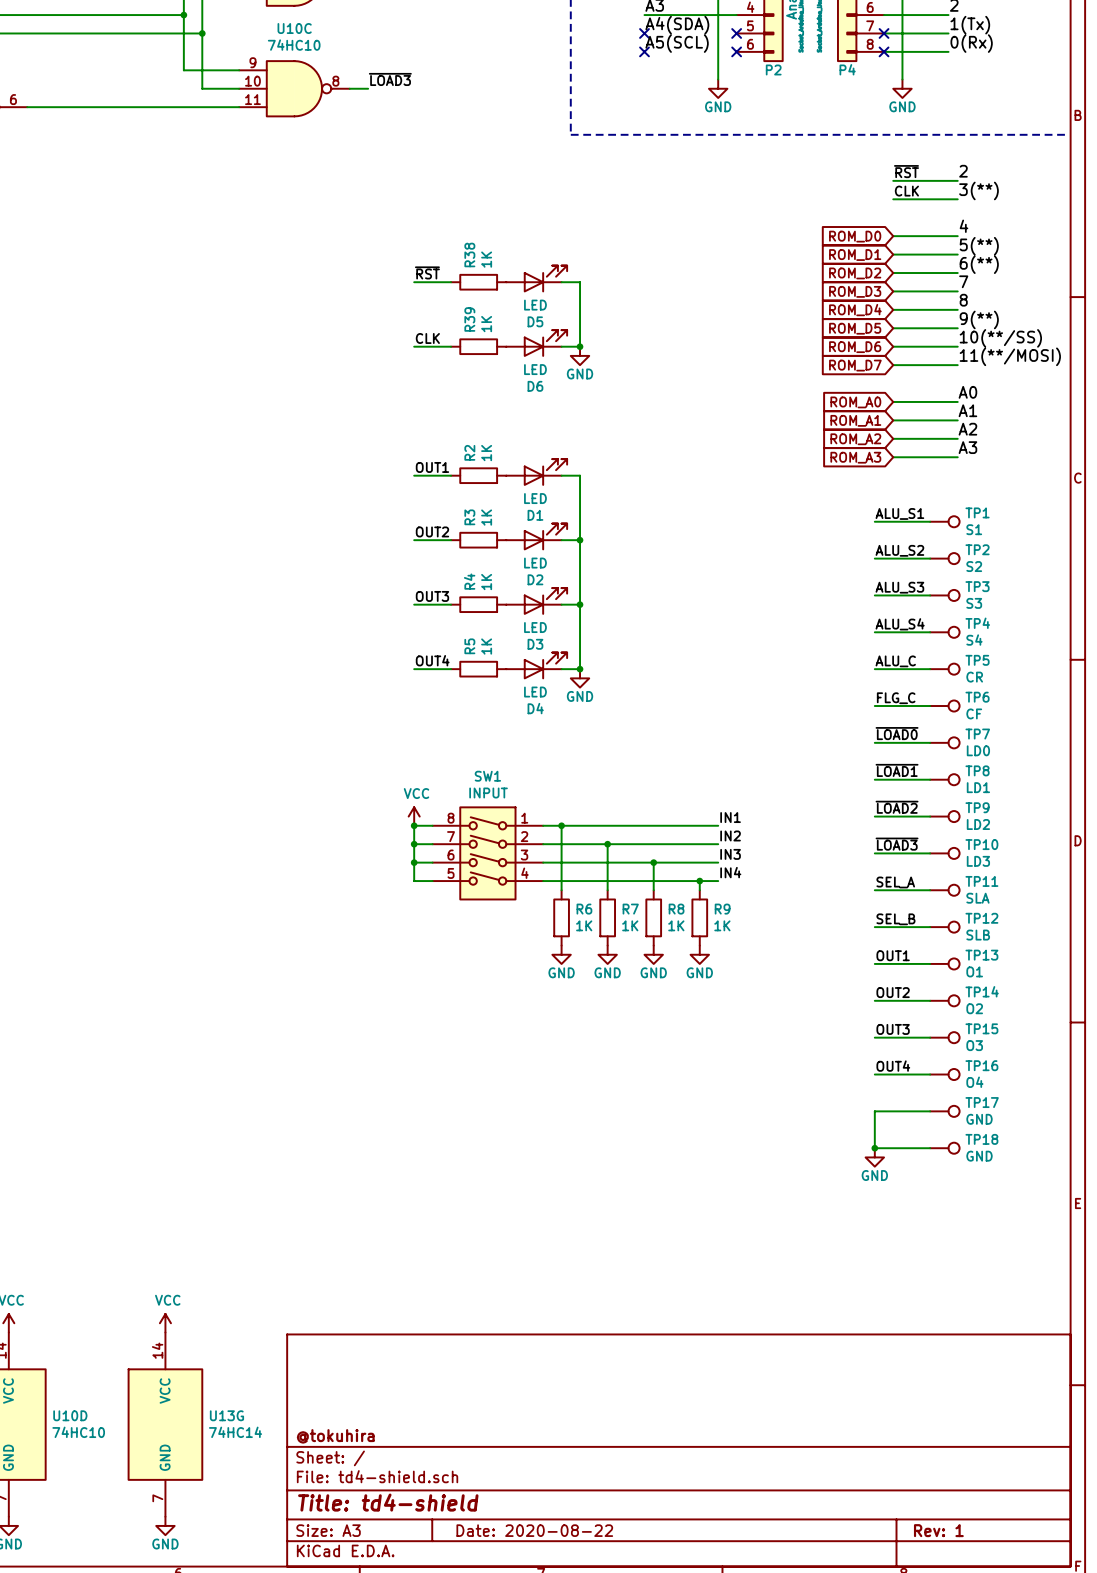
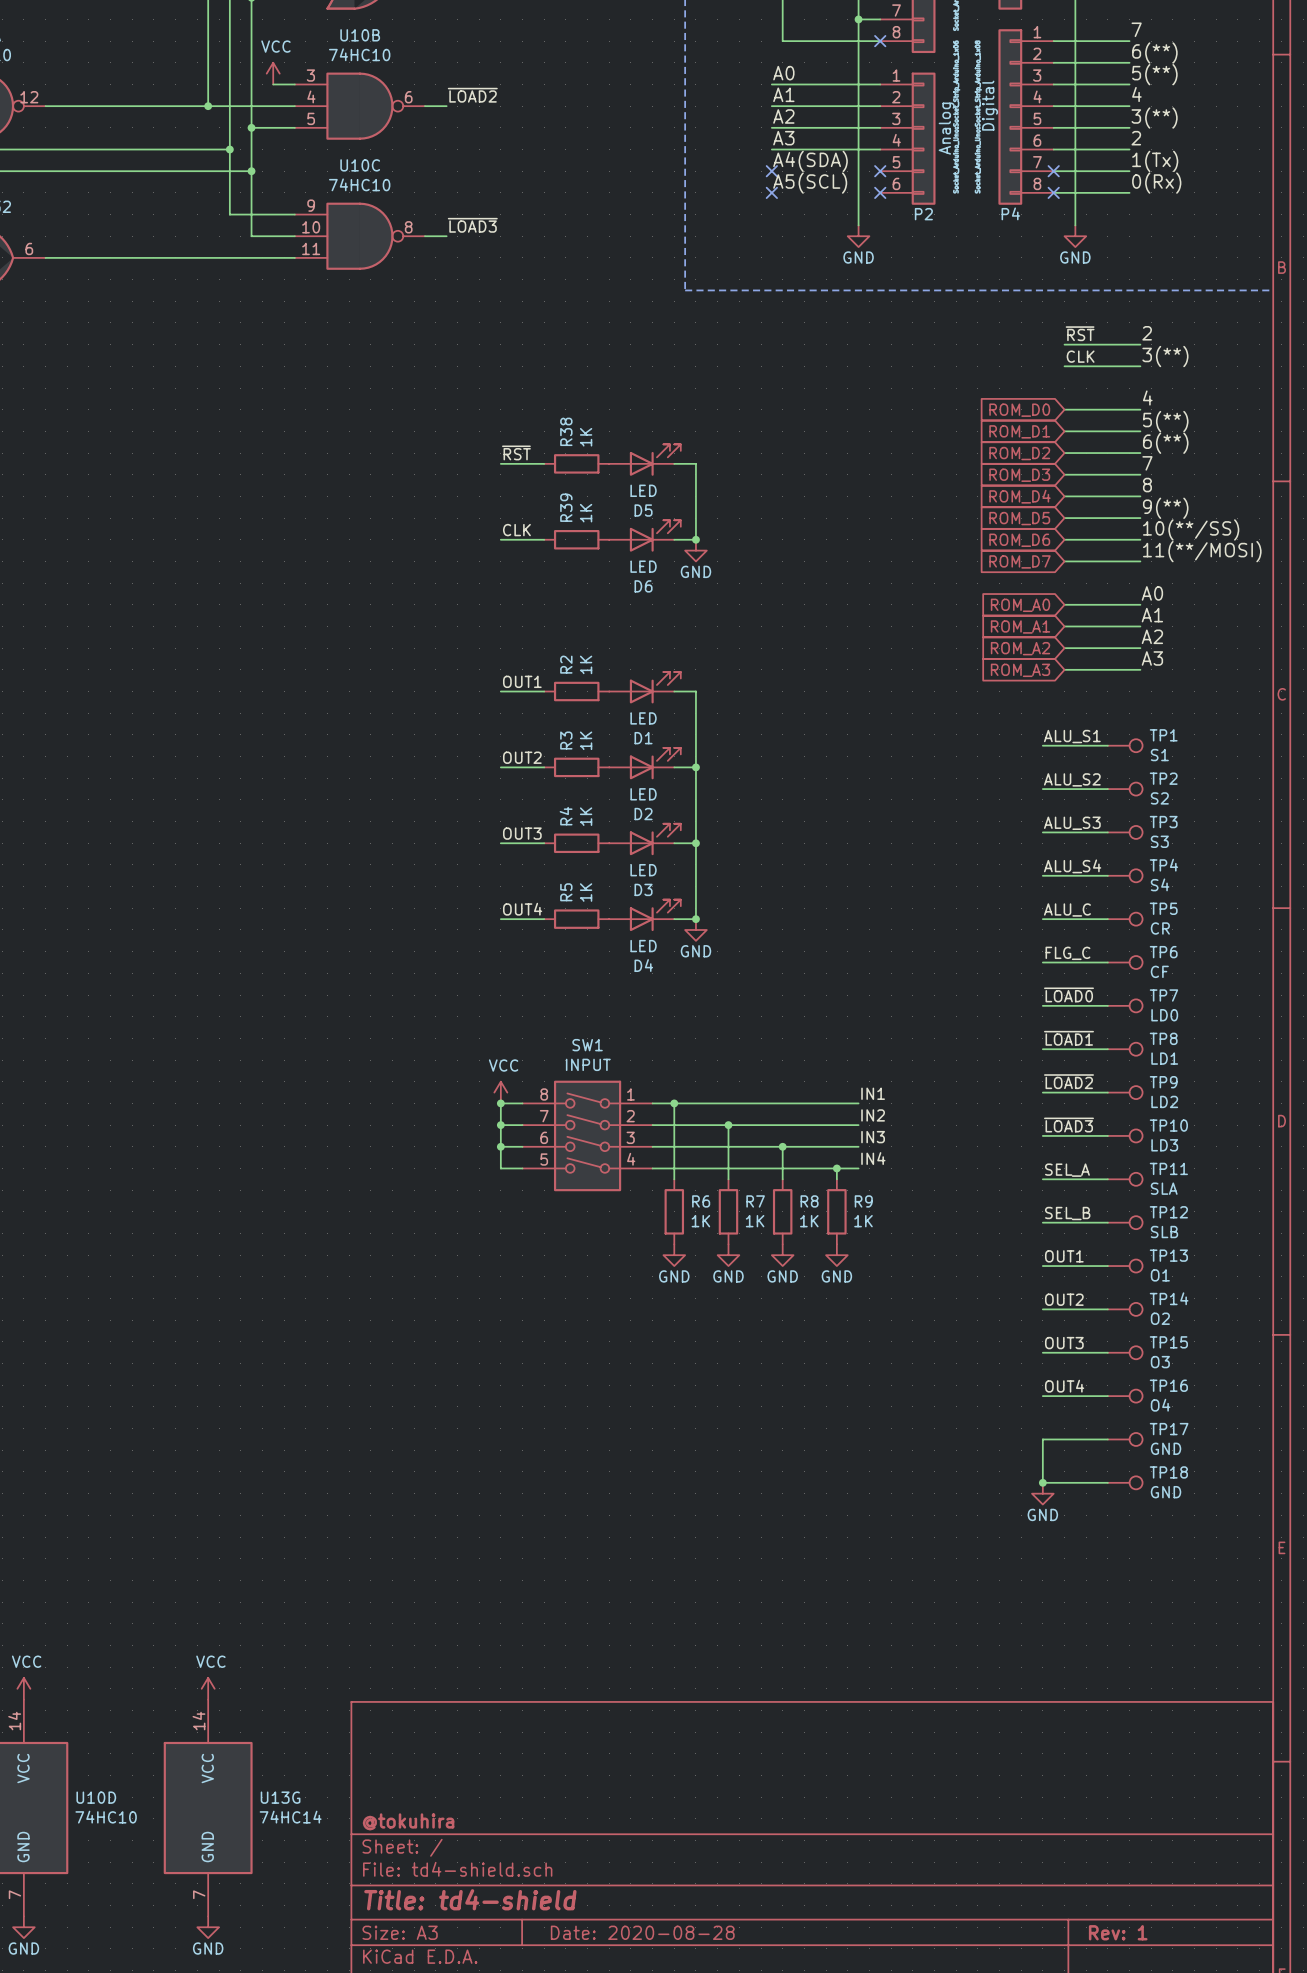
title block: Date: 2020-08-22 (534, 1530) -> Date: 2020-08-28 (642, 1932)

